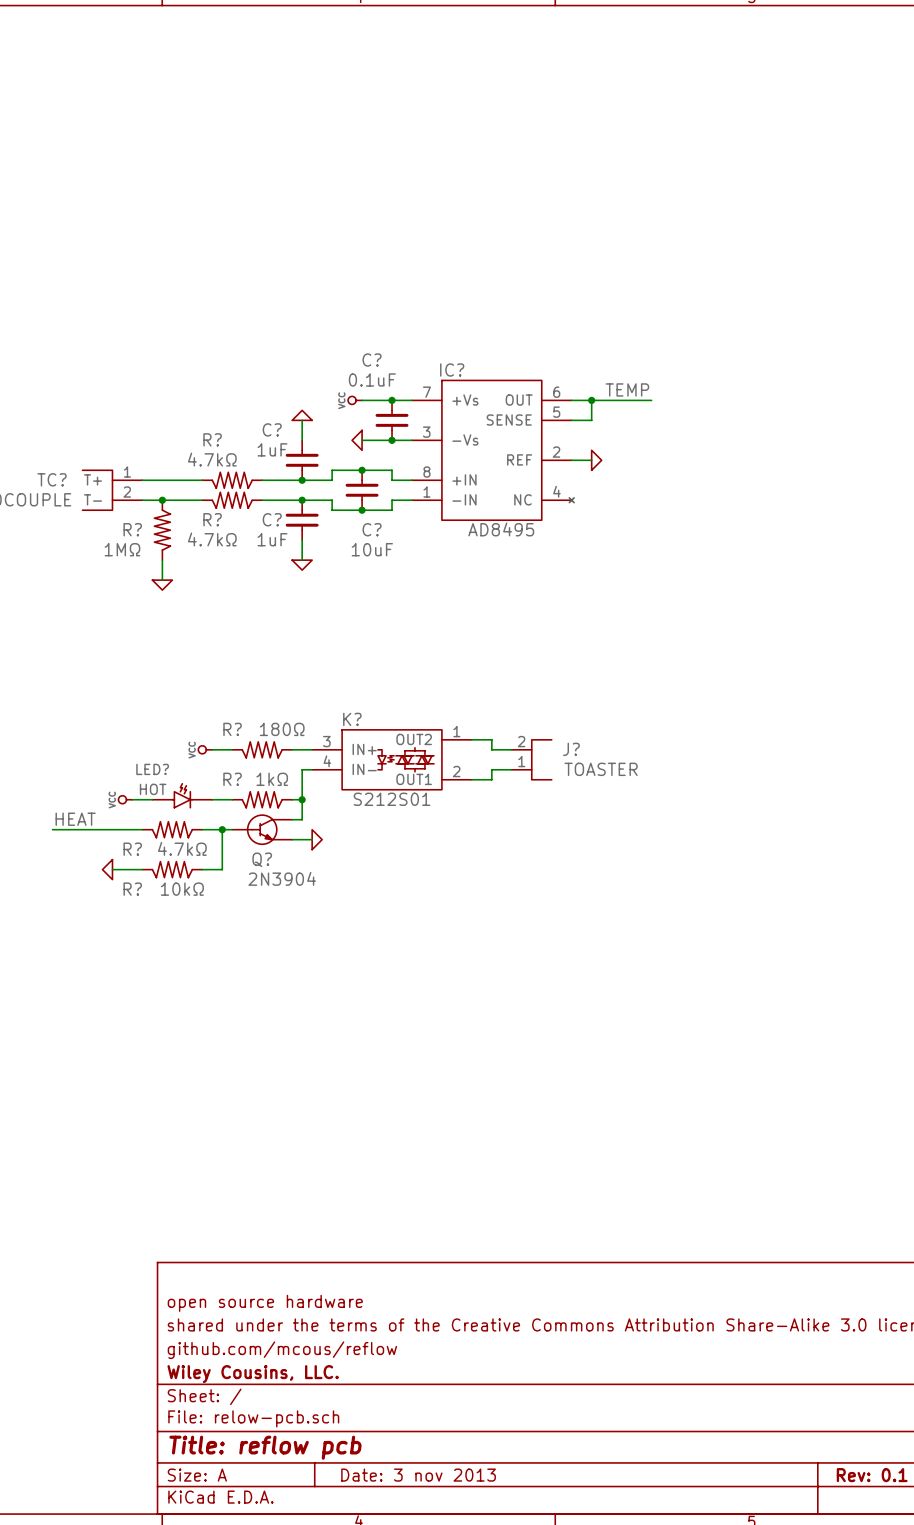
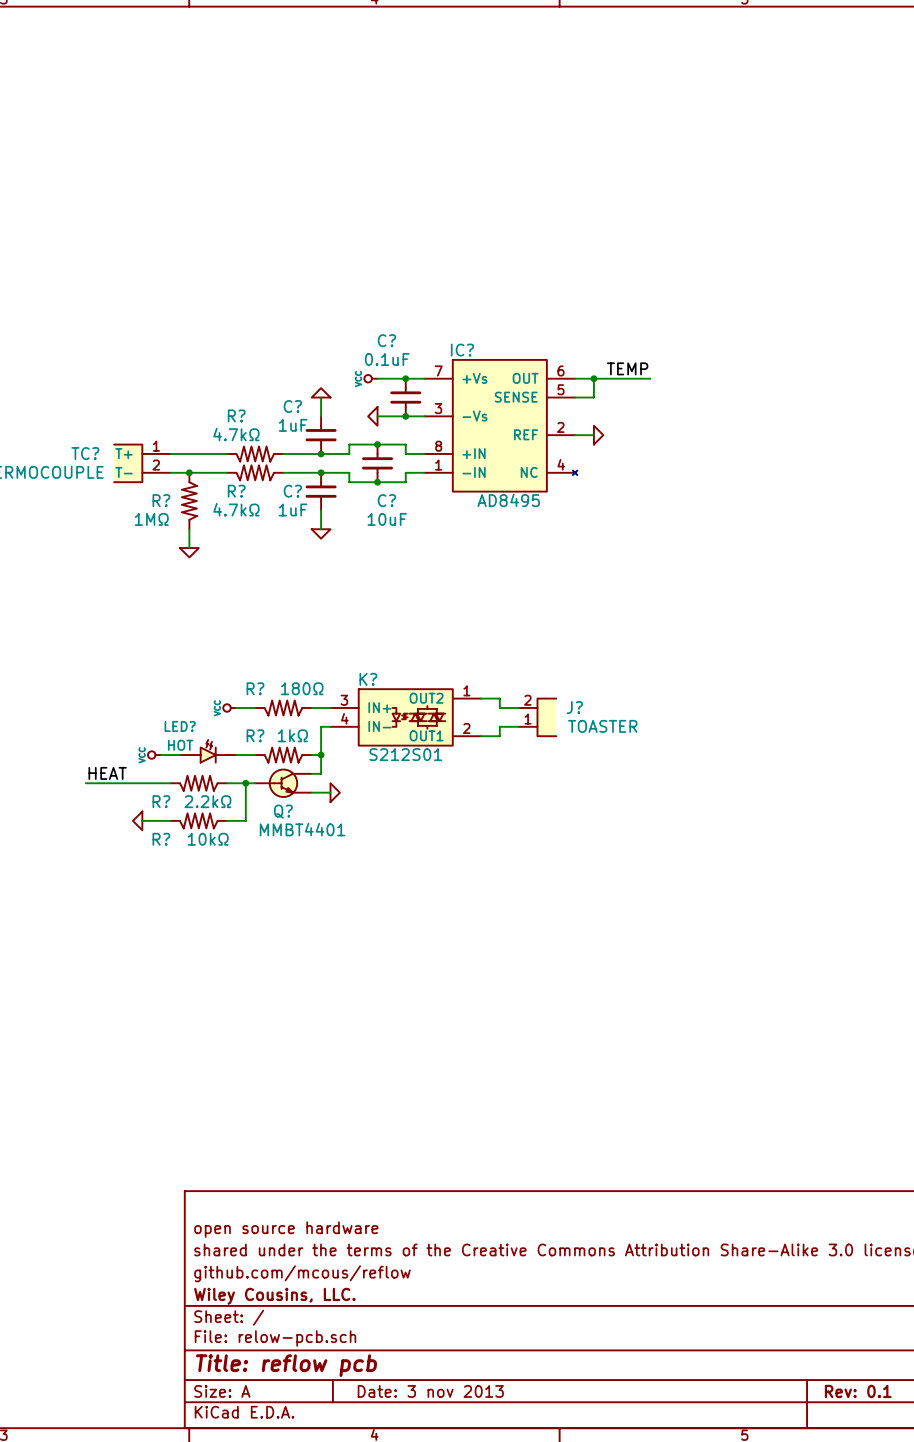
R? value: 4.7kΩ (182, 848) -> 2.2kΩ (207, 801)
Q? value: 2N3904 (282, 878) -> MMBT4401 (302, 829)

